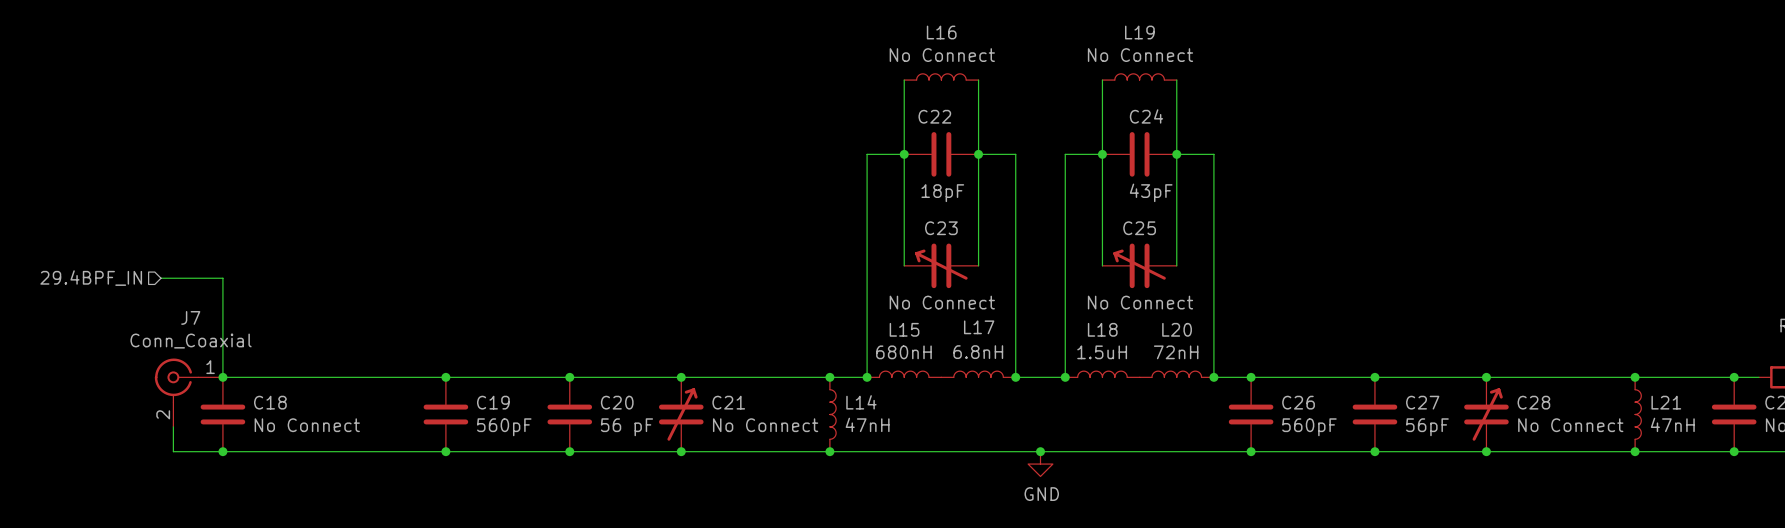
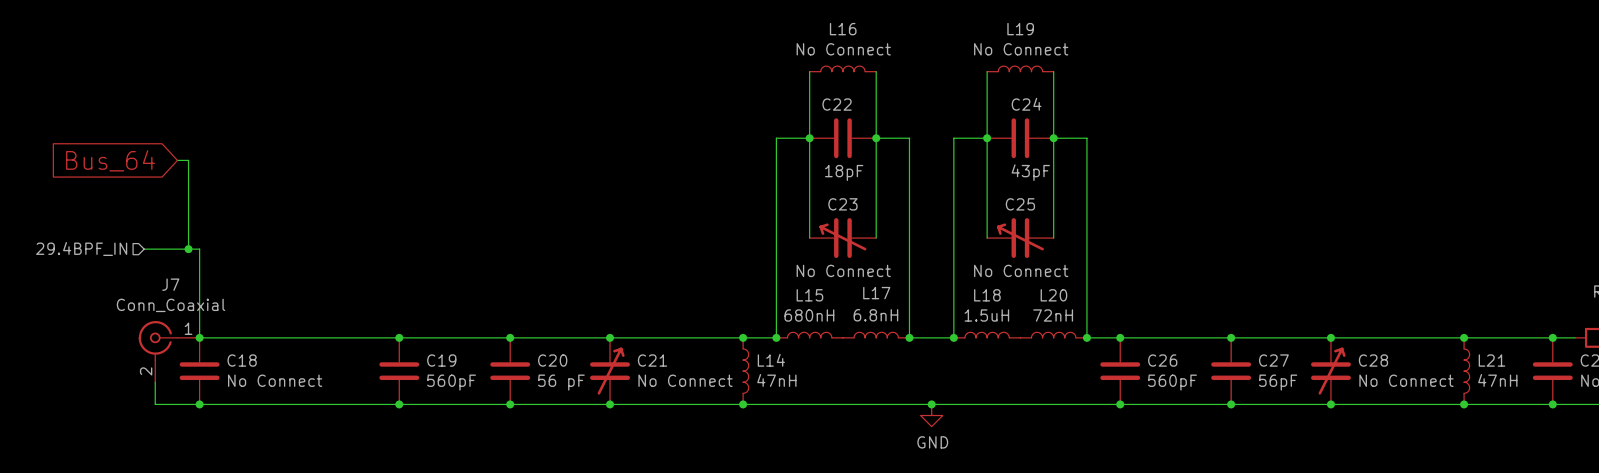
global label: none -> Bus_64 (110, 160)
wire: none -> (177, 160) (188, 160) (188, 249)
junction: none -> (188, 249)

